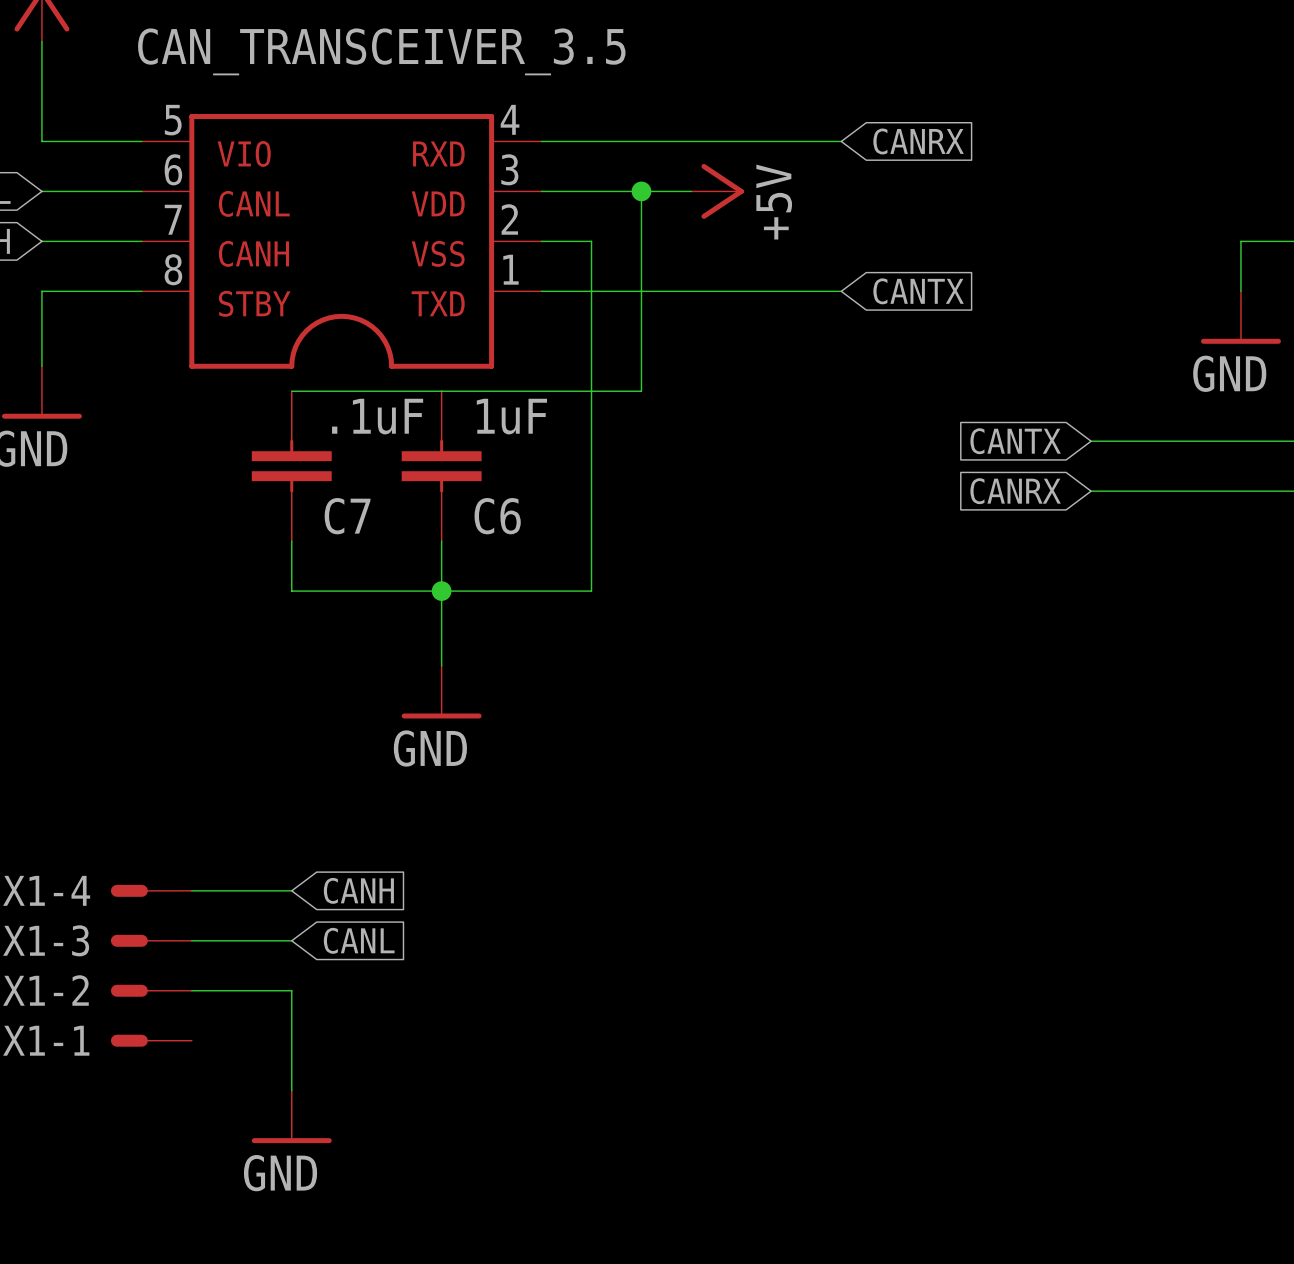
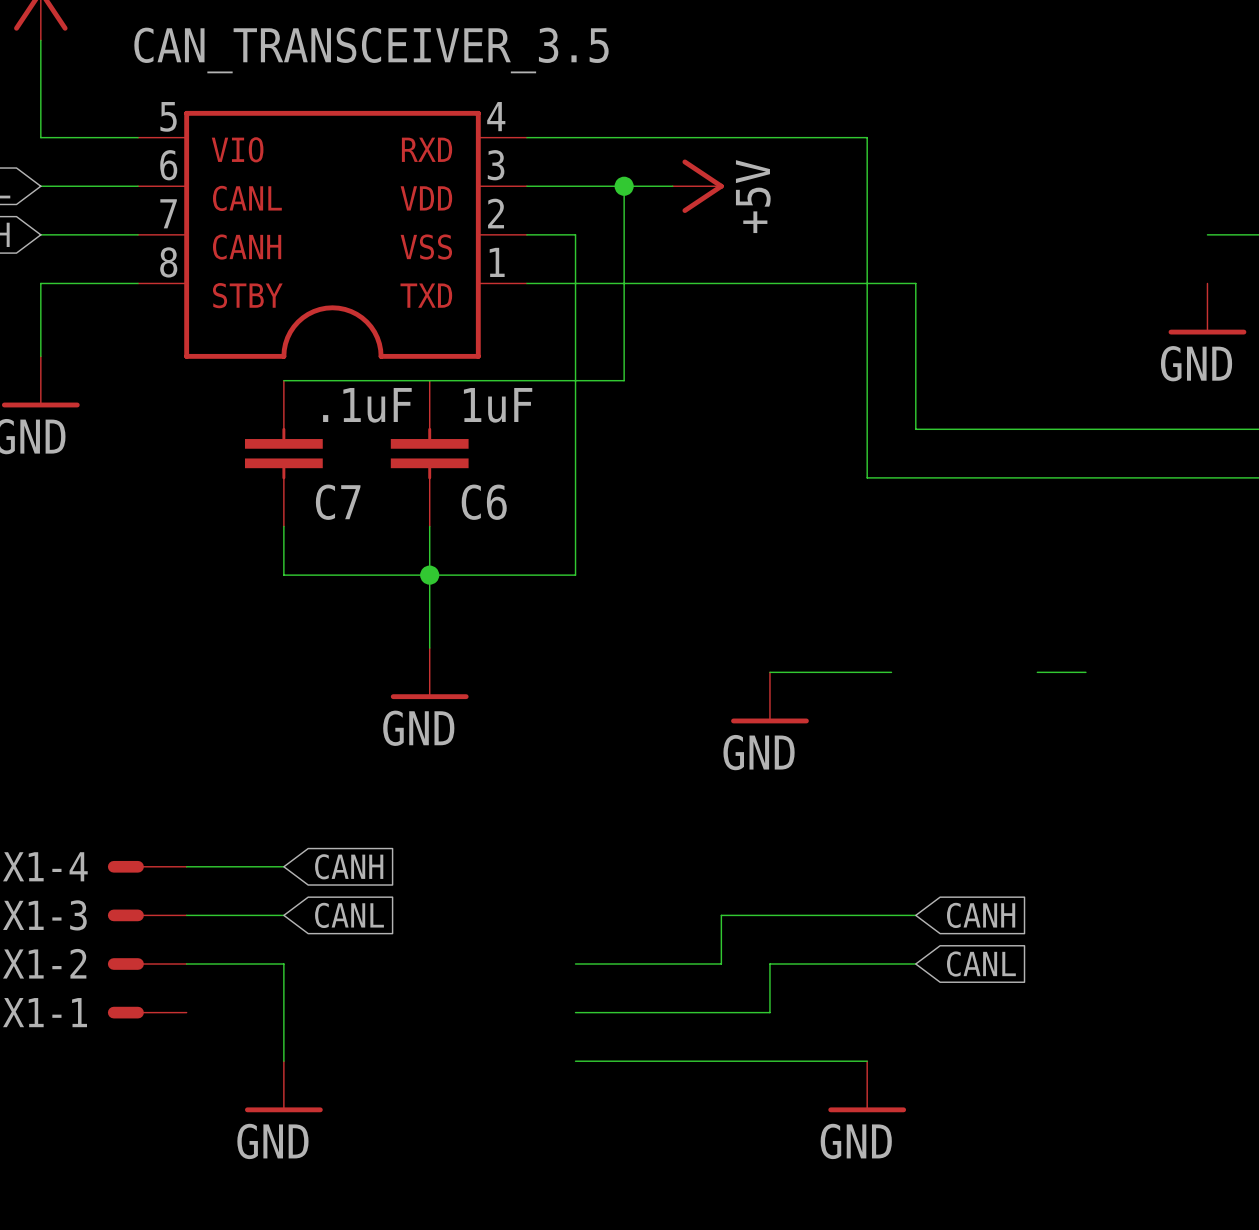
wire: none -> (818, 137) (867, 137) (867, 477) (1061, 477)
global label: CANRX (918, 141) -> none
wire: (1240, 241) (1240, 291) -> none
wire: none -> (818, 283) (915, 283) (915, 429) (1061, 429)
global label: CANTX (918, 291) -> none
global label: CANTX (1015, 441) -> none
global label: CANRX (1015, 491) -> none
wire: none -> (769, 672) (891, 672)
wire: none -> (1037, 672) (1085, 672)
power symbol: none -> GND (769, 697)
wire: none -> (915, 915) (721, 915) (721, 964) (575, 964)
global label: none -> CANH (981, 915)
wire: none -> (915, 964) (769, 964) (769, 1012) (575, 1012)
global label: none -> CANL (981, 964)
wire: none -> (575, 1061) (867, 1061)
power symbol: none -> GND (867, 1086)

